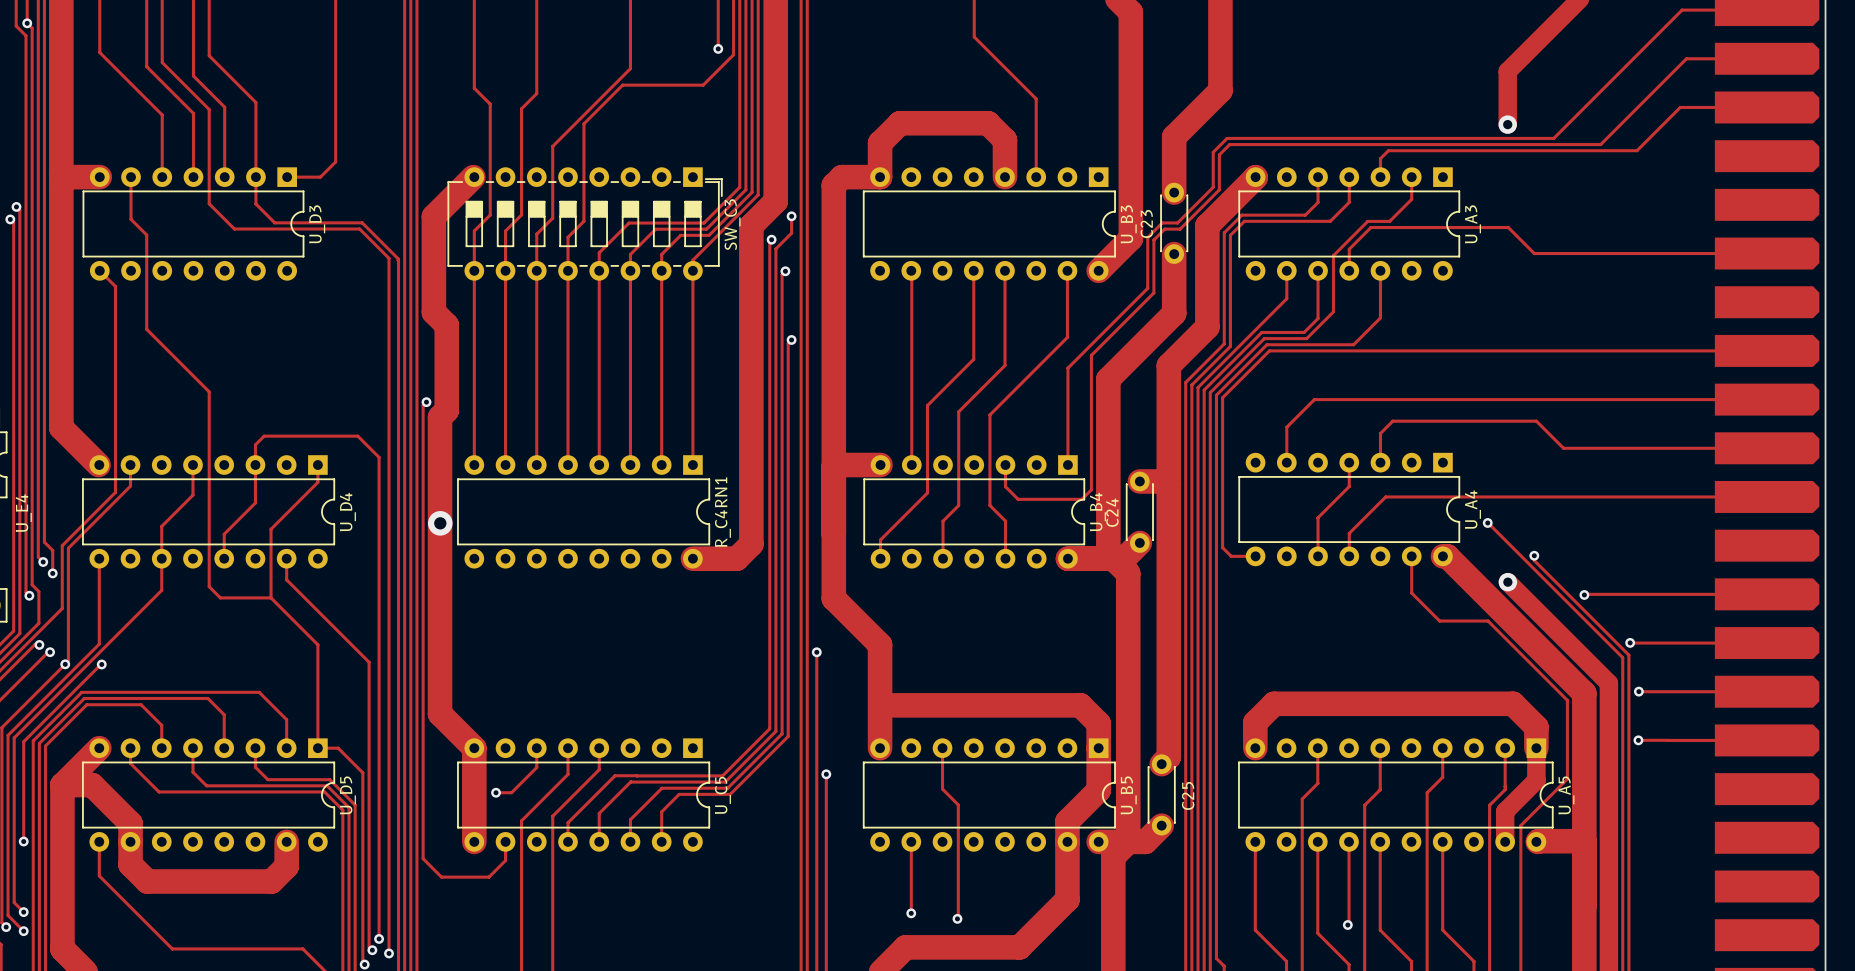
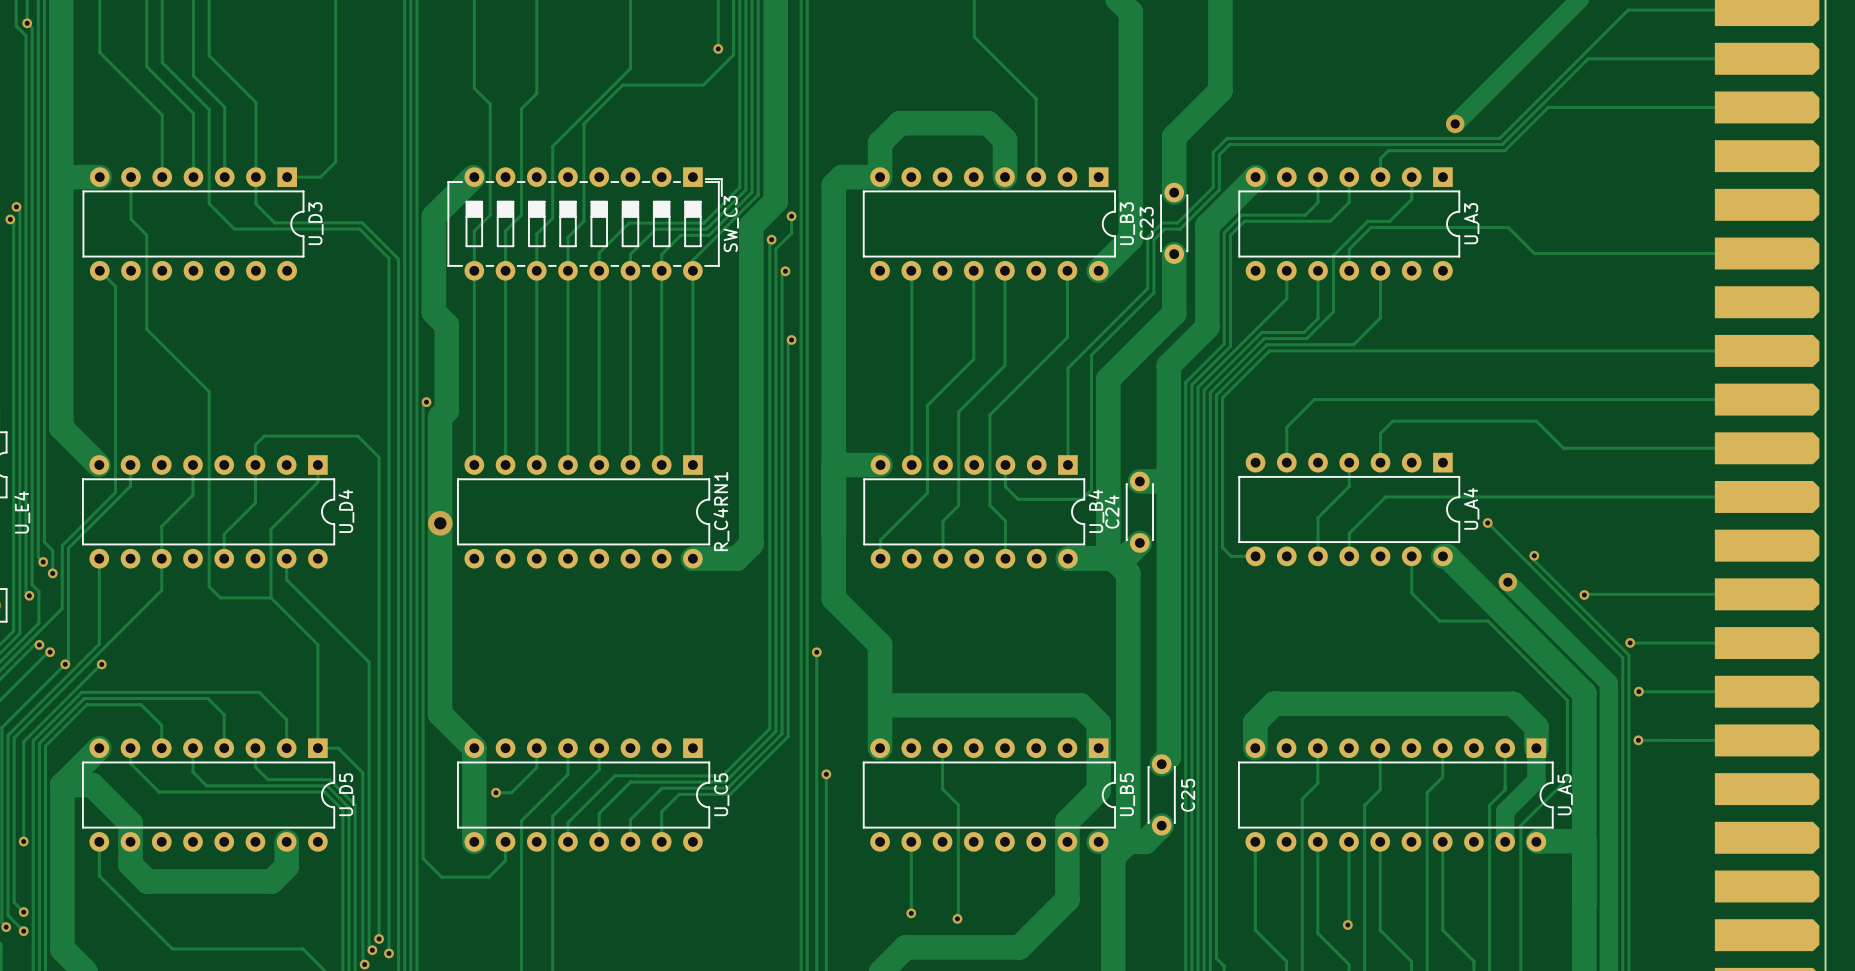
track: (1682, 10) (1553, 138) (1499, 138) -> (1682, 10) (1628, 10) (1499, 138)
track: (1686, 58) (1600, 144) (1502, 144) -> (1686, 58) (1588, 58) (1502, 144)
track: (1507, 71) (1507, 124) -> (1507, 71) (1455, 123)
track: (1680, 107) (1637, 150) (1504, 150) -> (1680, 107) (1548, 107) (1504, 150)
via position: (1507, 124) -> (1455, 123)

